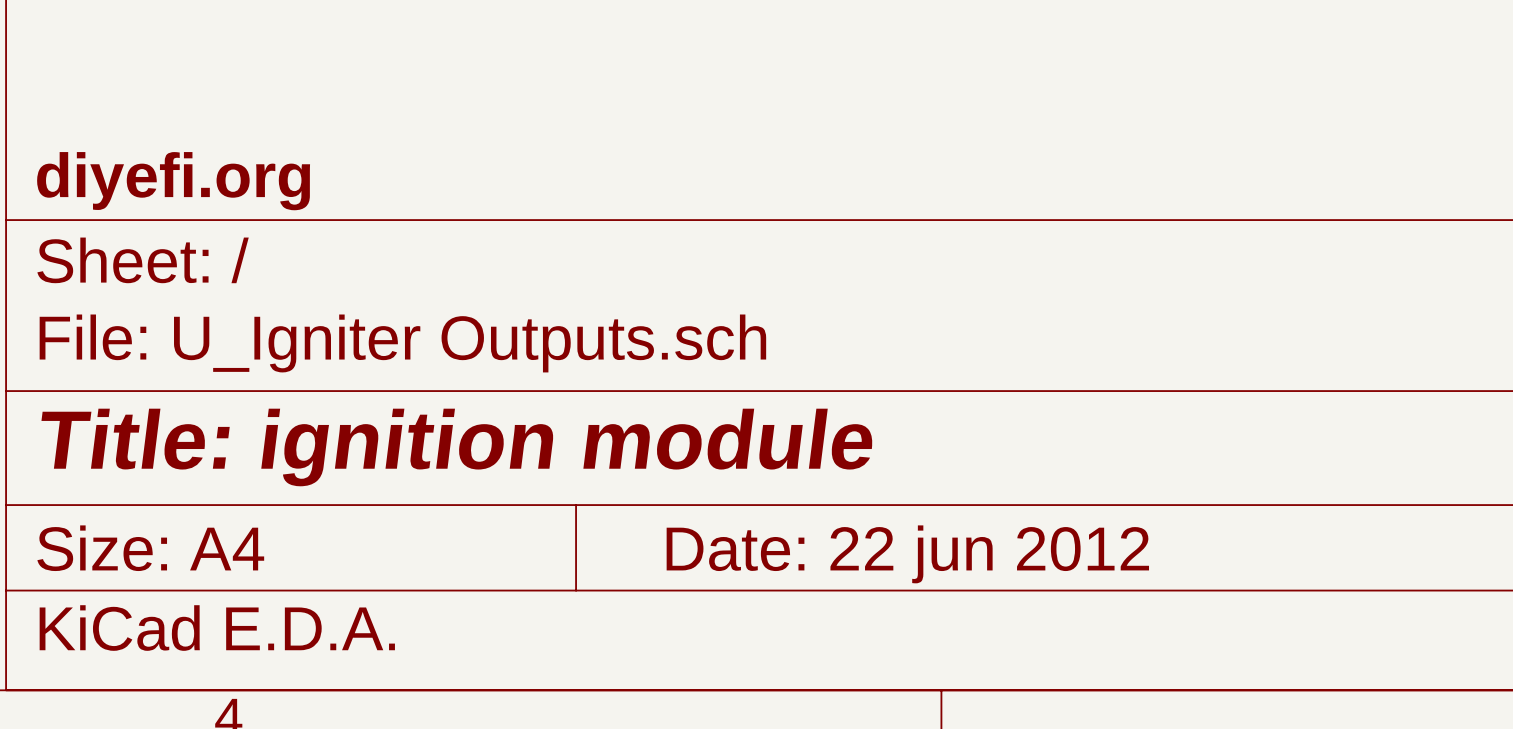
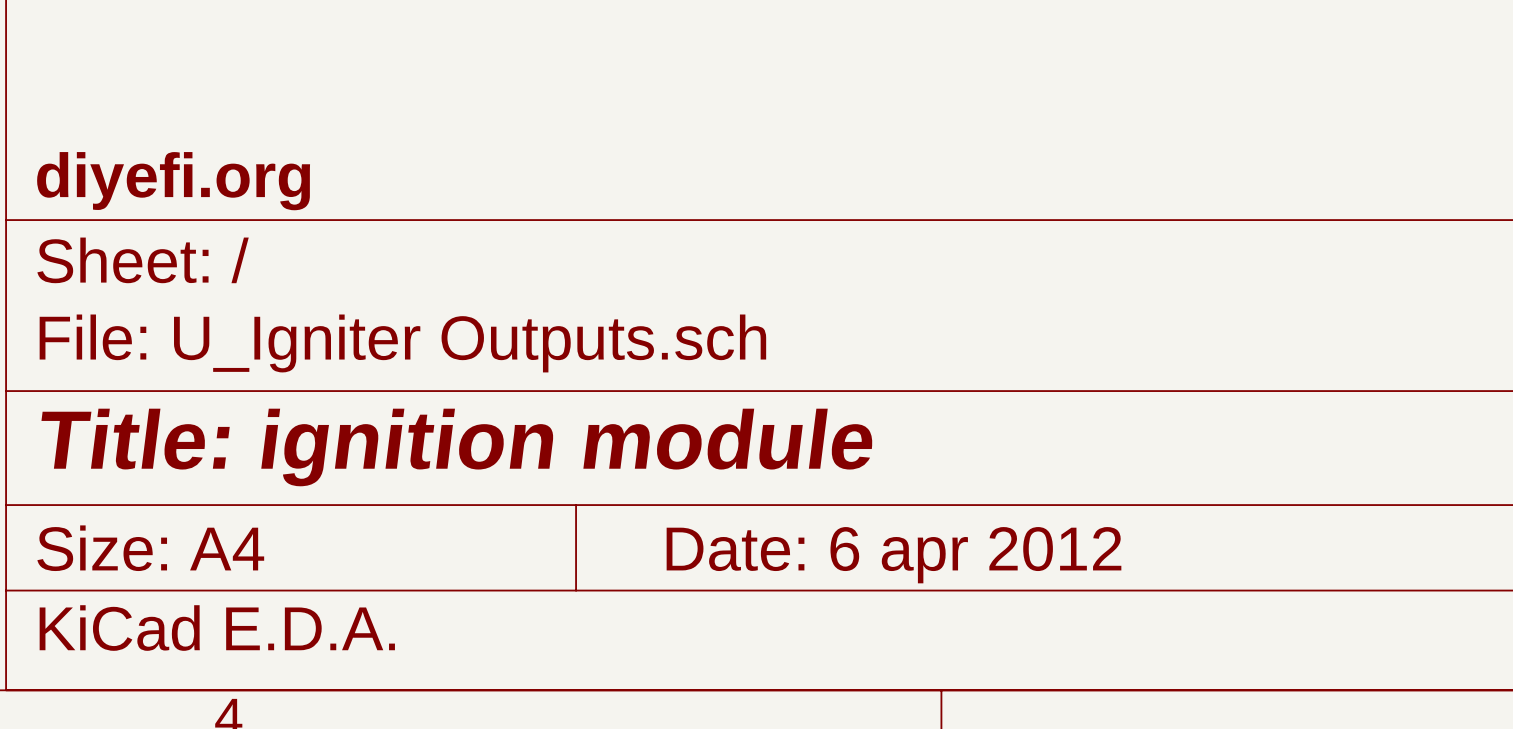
title block: Date: 22 jun 2012 (907, 554) -> Date: 6 apr 2012 (894, 555)

